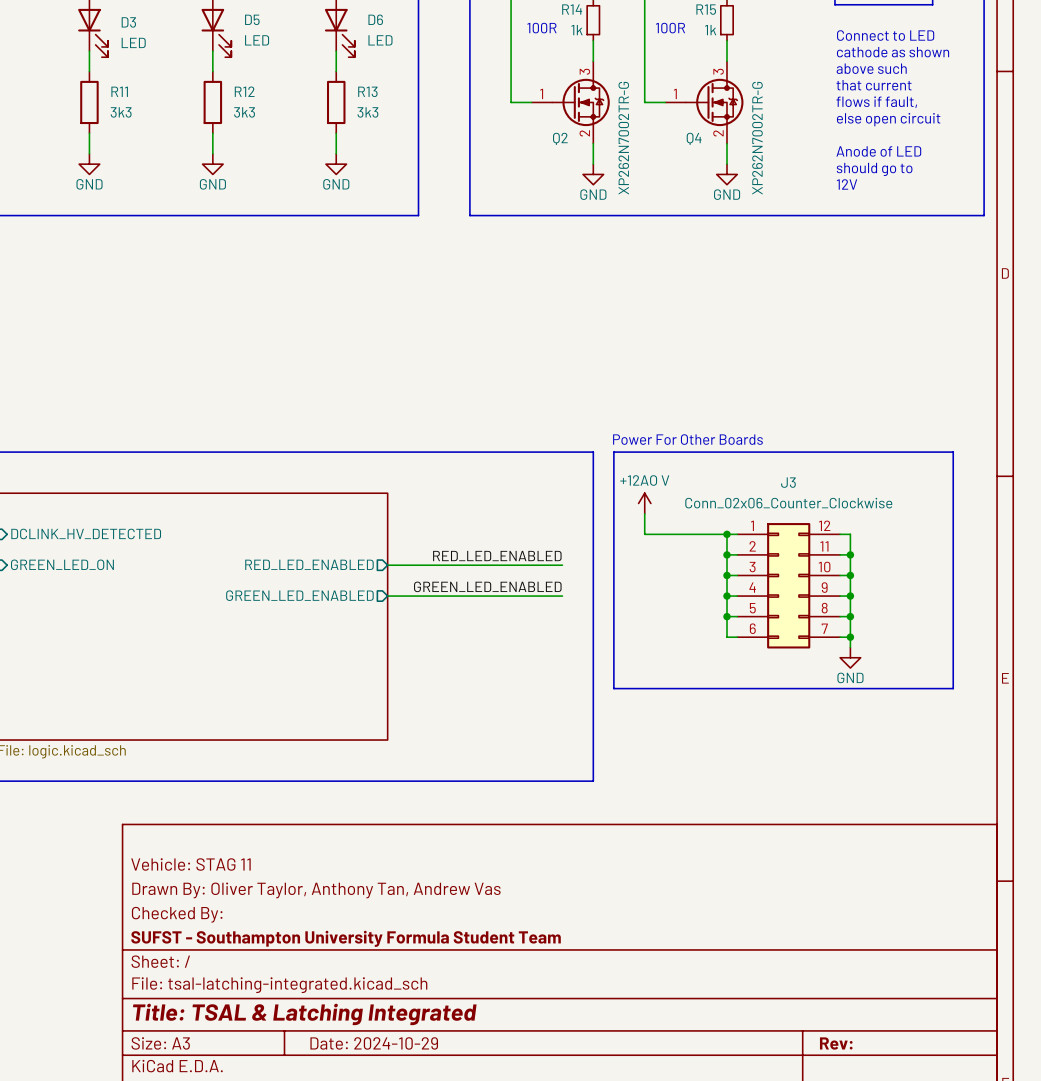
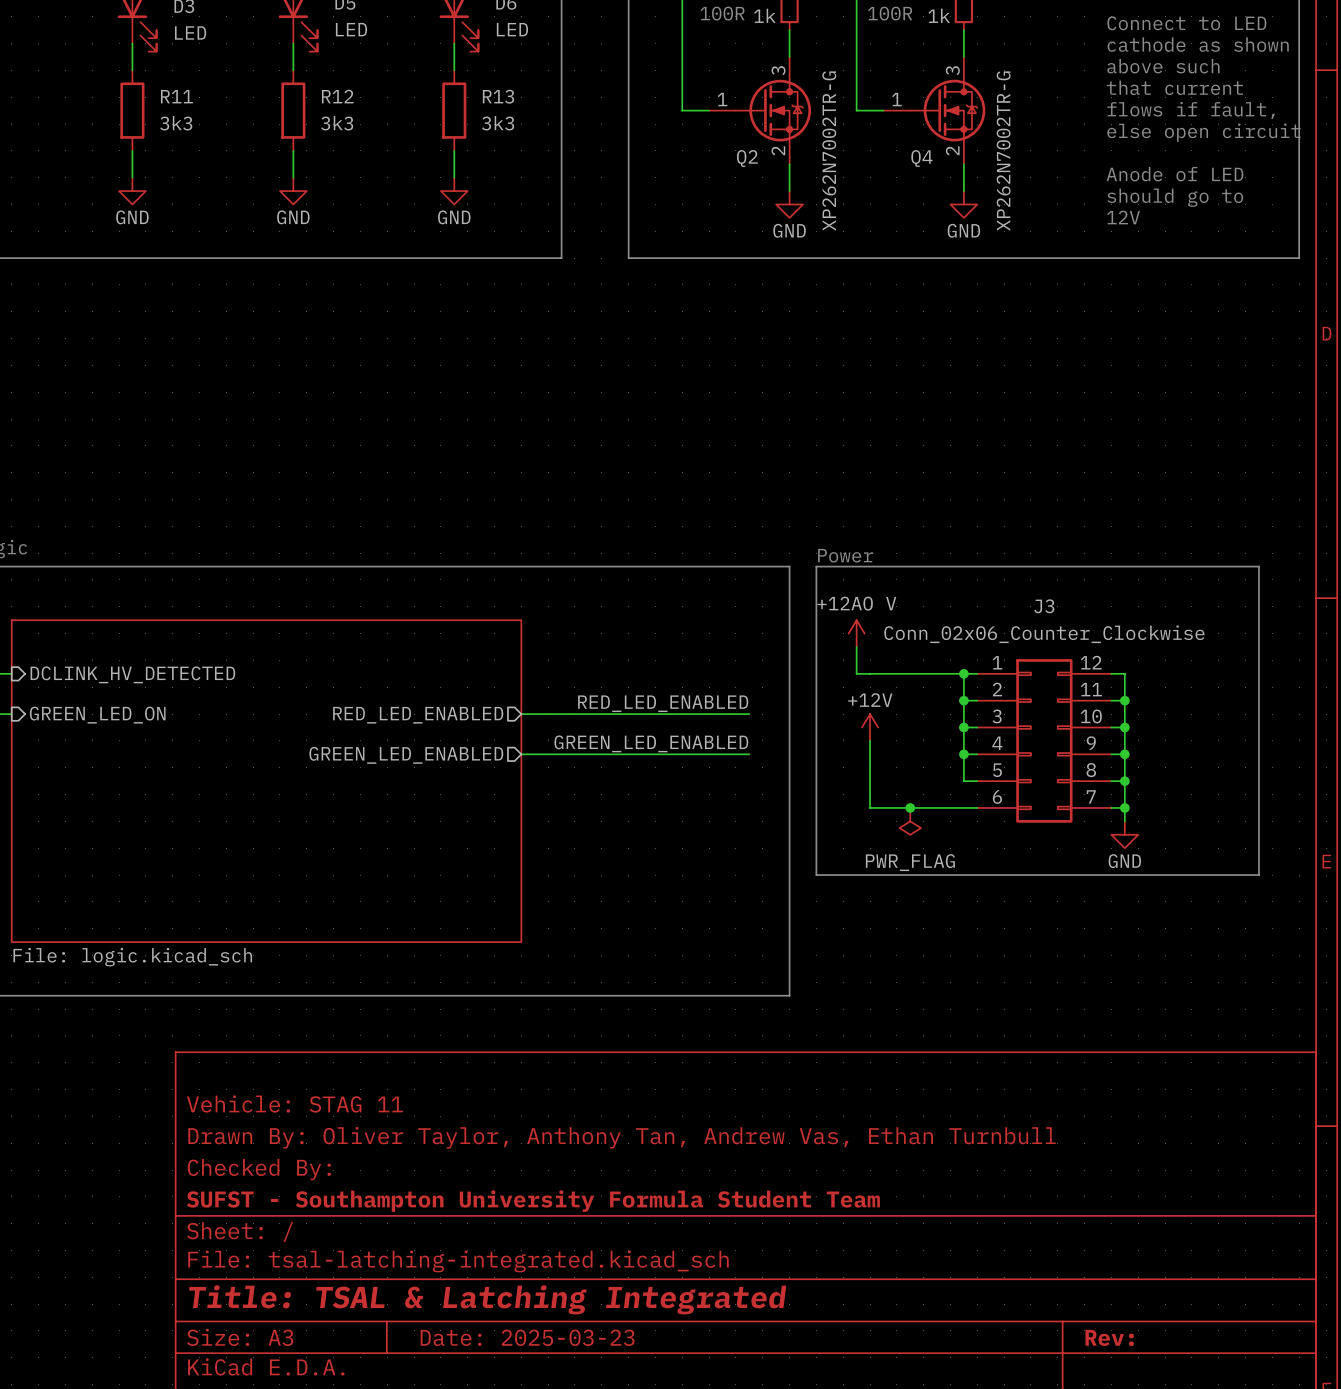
text: Power For Other Boards (687, 439) -> Power (845, 555)
power symbol: none -> +12V (870, 727)
wire: (727, 616) (727, 637) -> (870, 740) (870, 807) (963, 807)
junction position: (727, 616) -> (910, 807)
power symbol: none -> PWR_FLAG (910, 821)
title block: Drawn By: Oliver Taylor, Anthony Tan, Andrew Vas (316, 890) -> Drawn By: Oliver Taylor, Anthony Tan, Andrew Vas, Ethan Turnbull (622, 1137)
title block: Date: 2024-10-29 (374, 1043) -> Date: 2025-03-23 (527, 1337)

